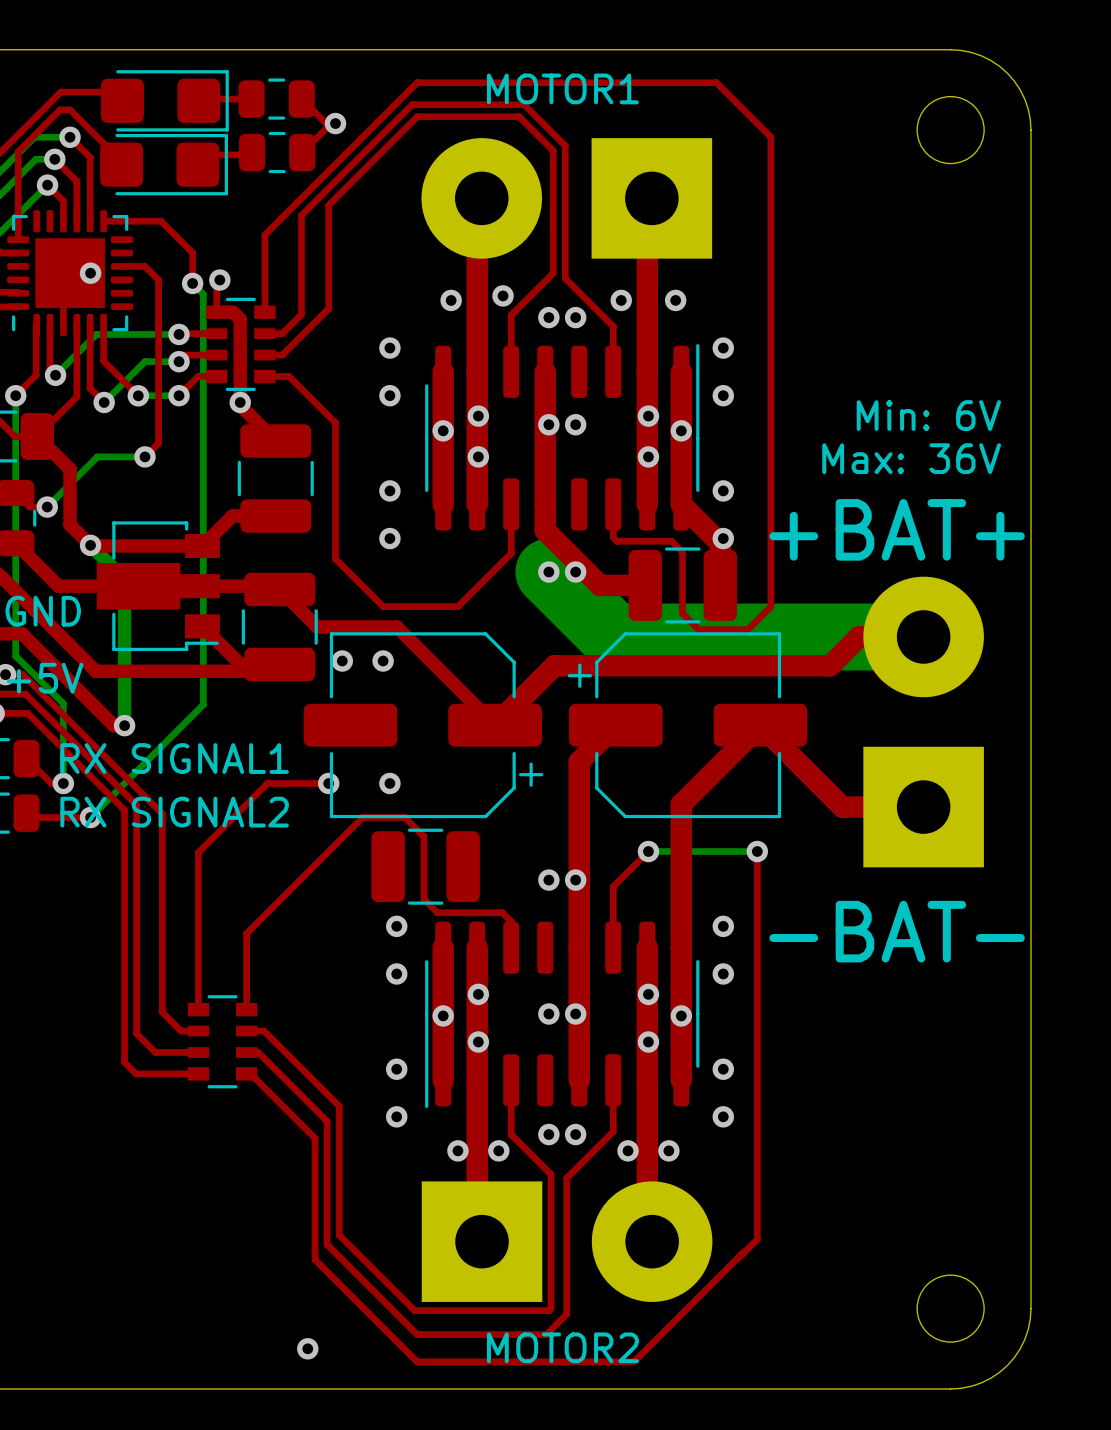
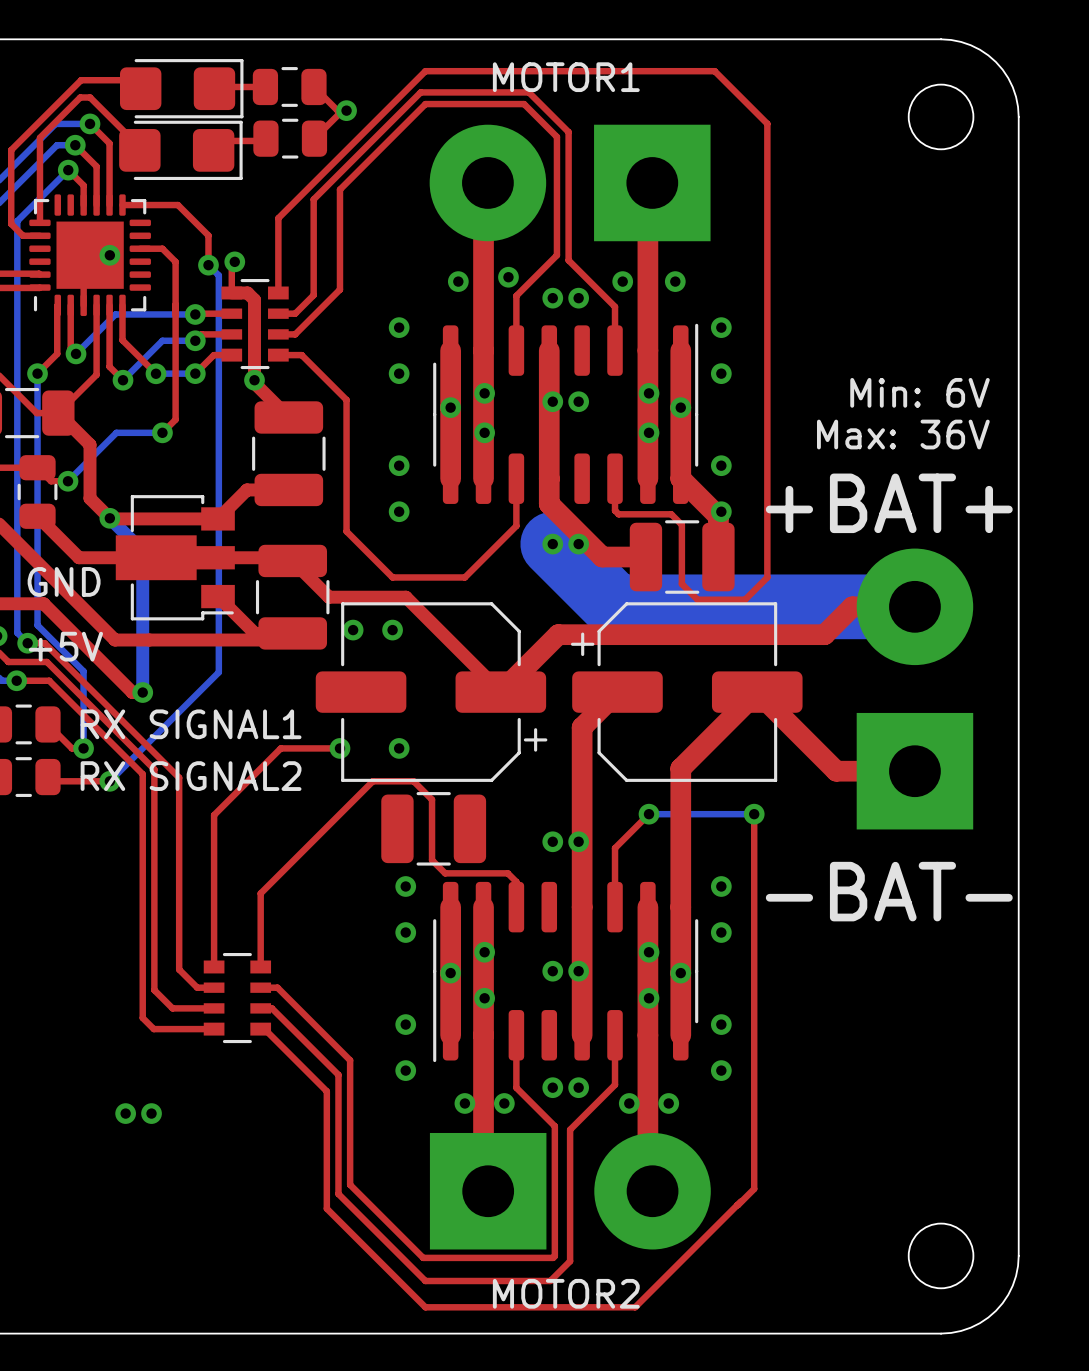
via: none -> (125, 1113)
via: none -> (151, 1113)
via: (307, 1348) -> none

